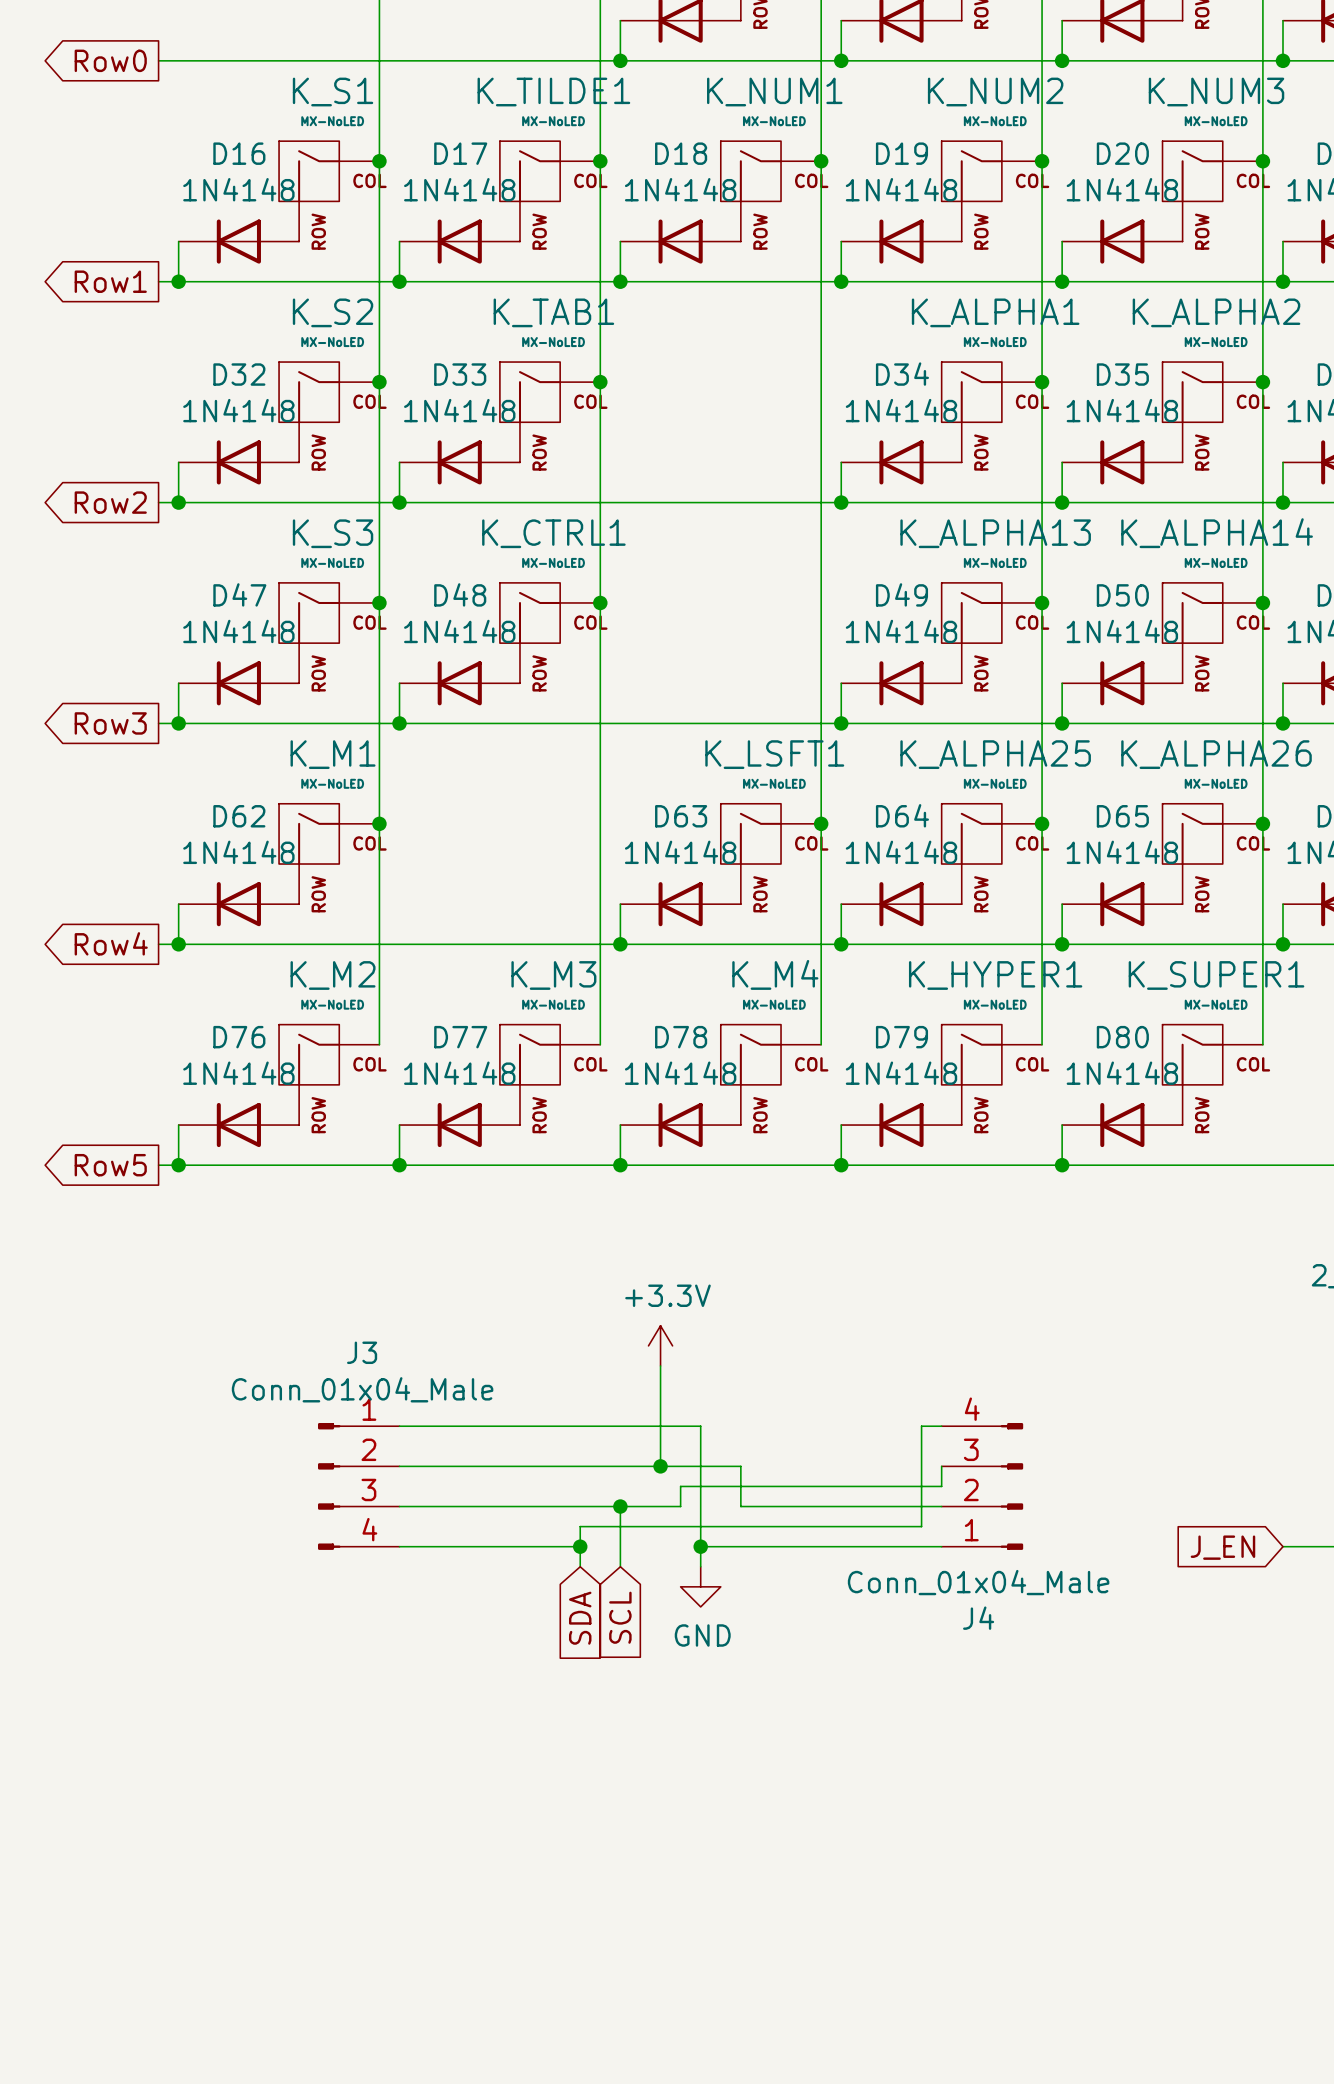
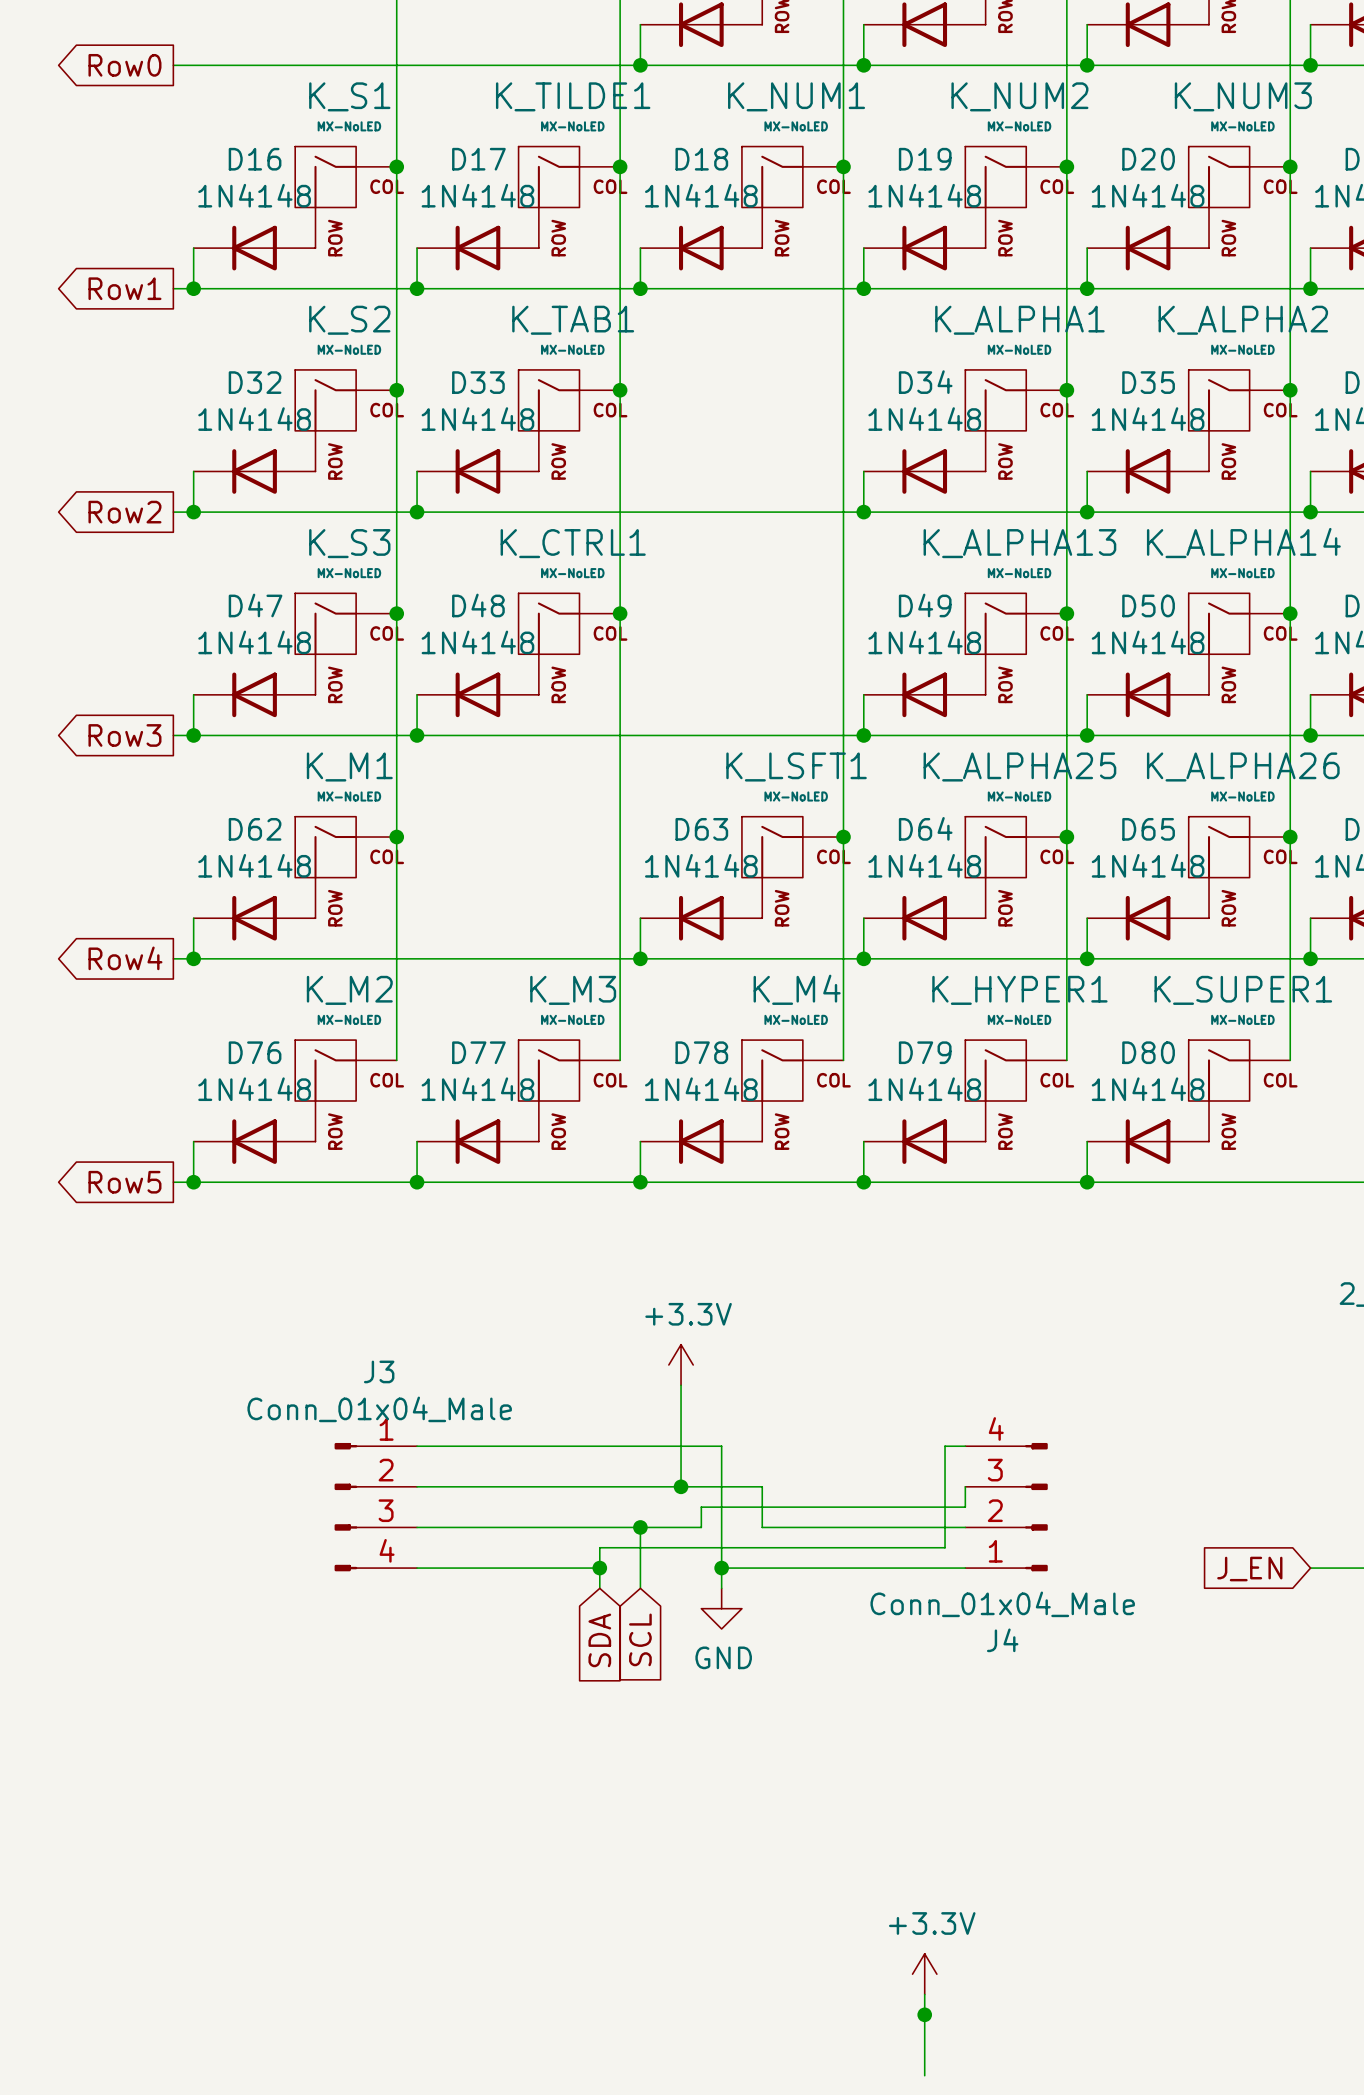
power symbol: none -> +3.3V (924, 1974)
wire: none -> (924, 1994) (924, 2075)
junction: none -> (924, 2014)

